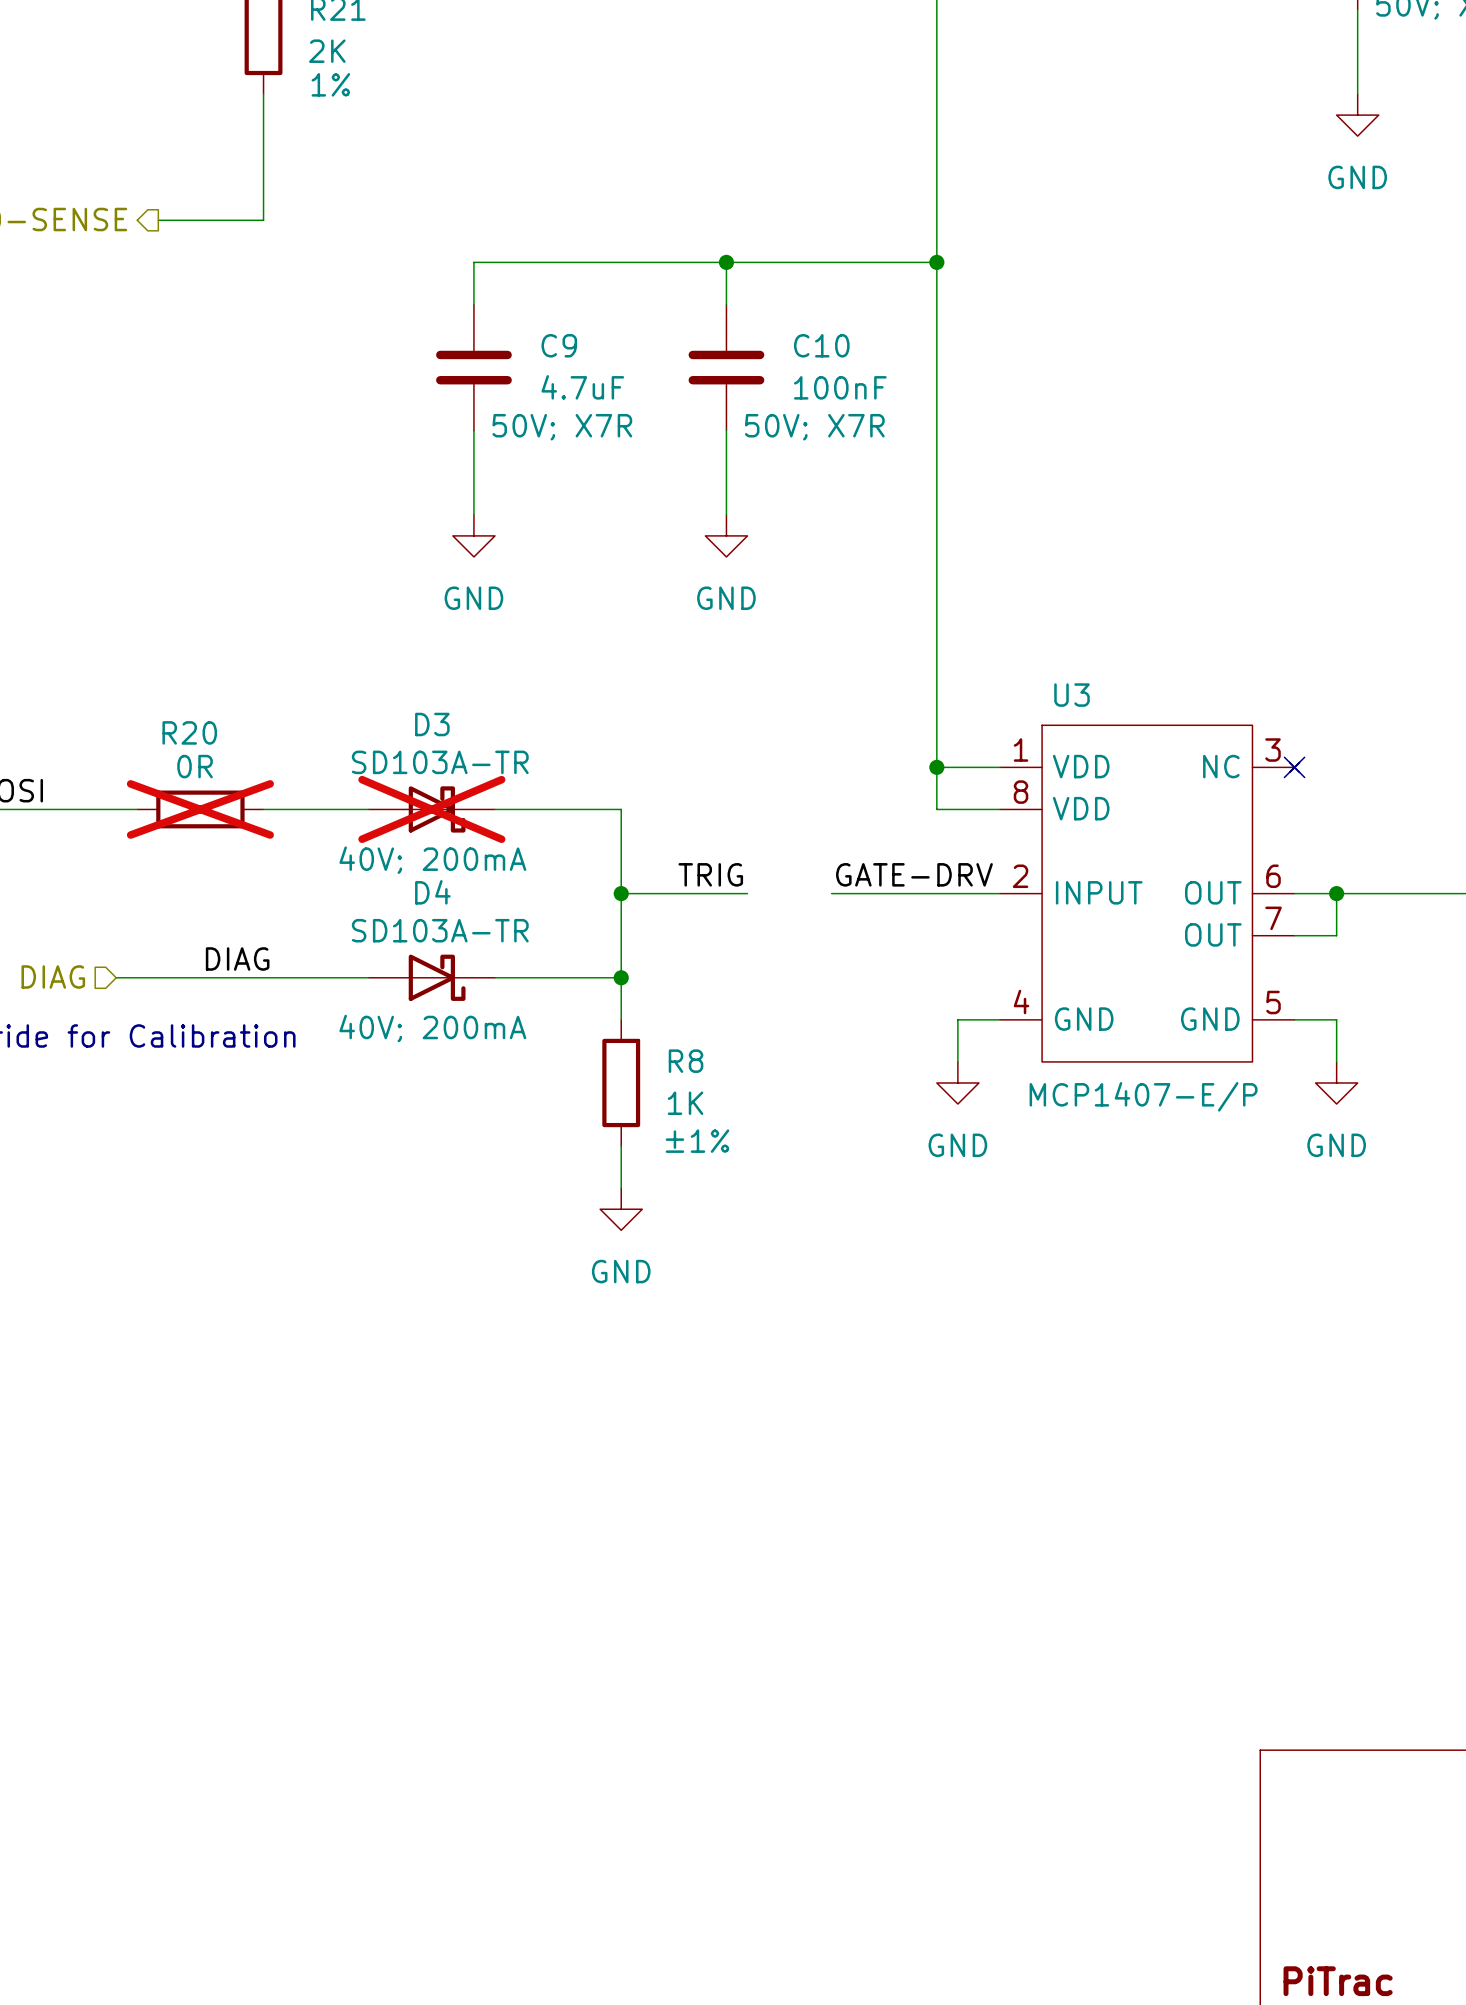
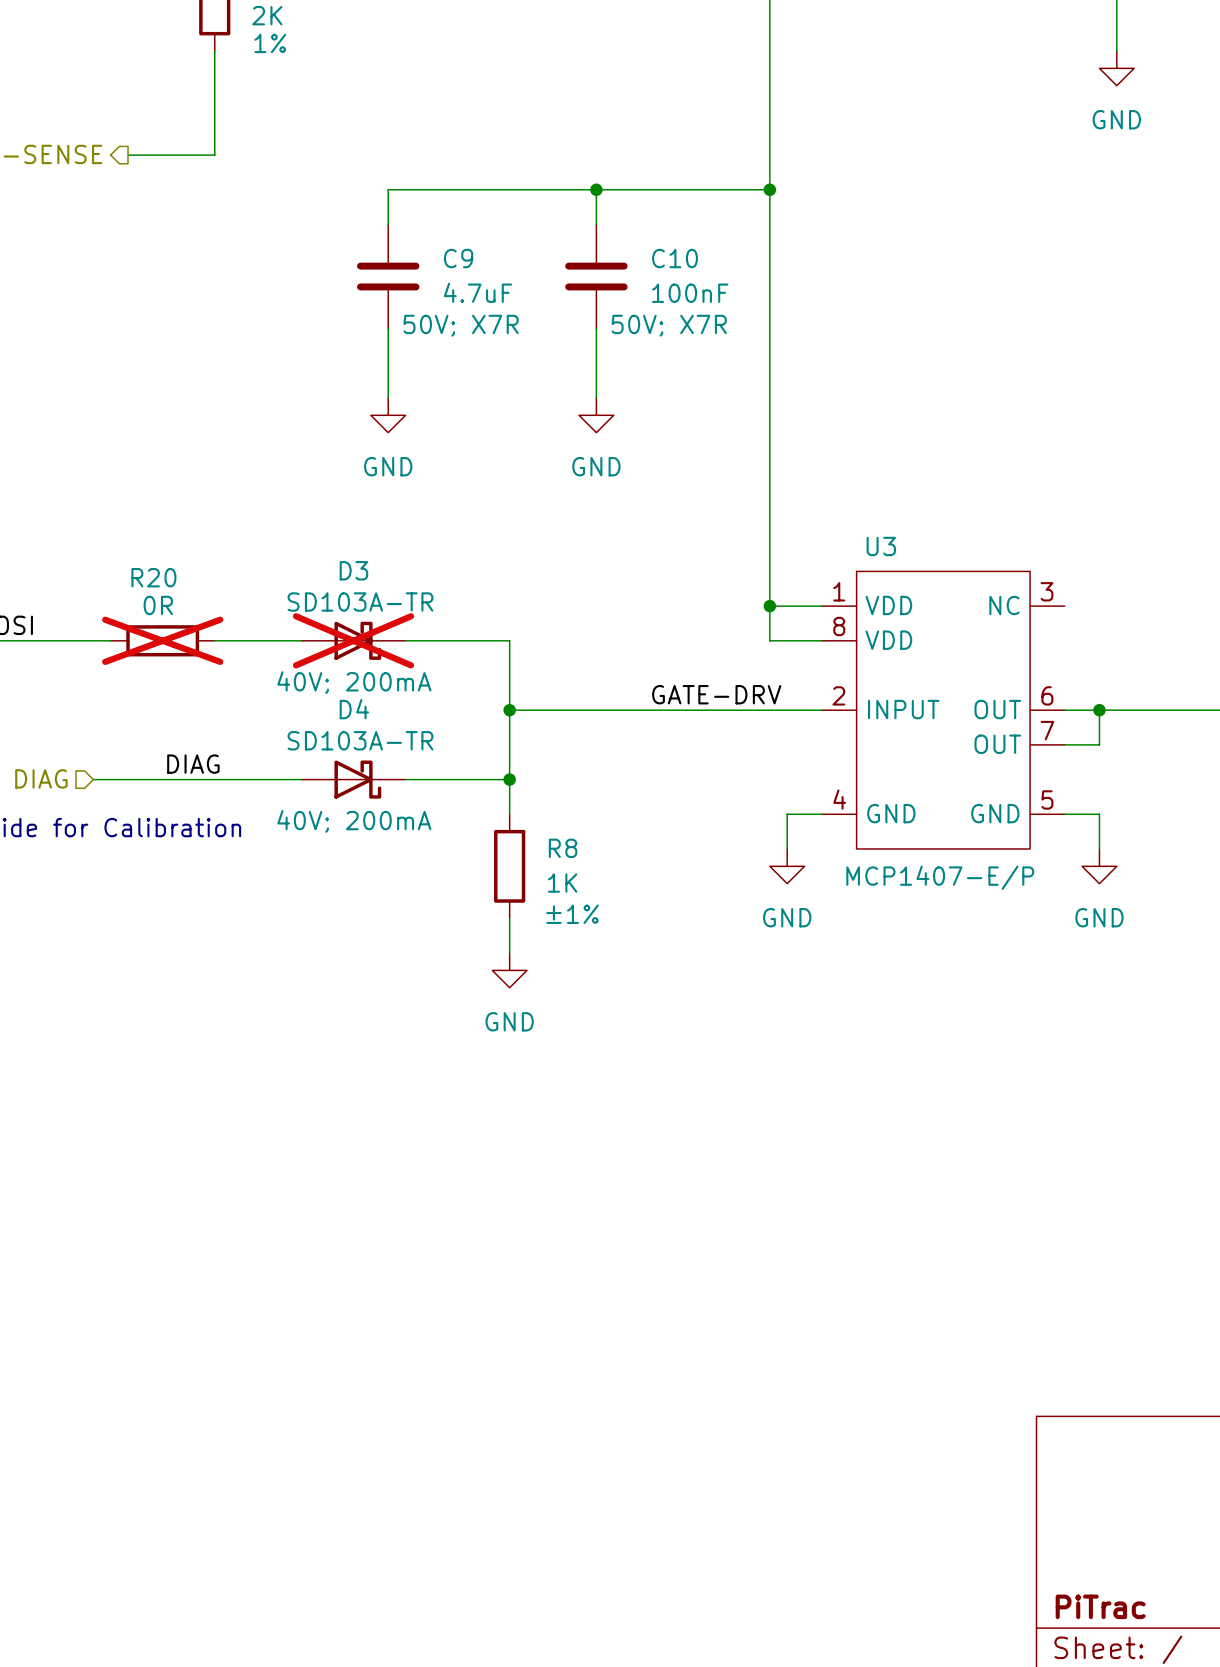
U3 symbol: [999, 725, 1300, 1062] -> [821, 571, 1065, 849]
no-connect mark: (1294, 767) -> none
label: TRIG (710, 874) -> none
label position: GATE-DRV (914, 874) -> GATE-DRV (716, 694)
wire: none -> (613, 710) (683, 710)

